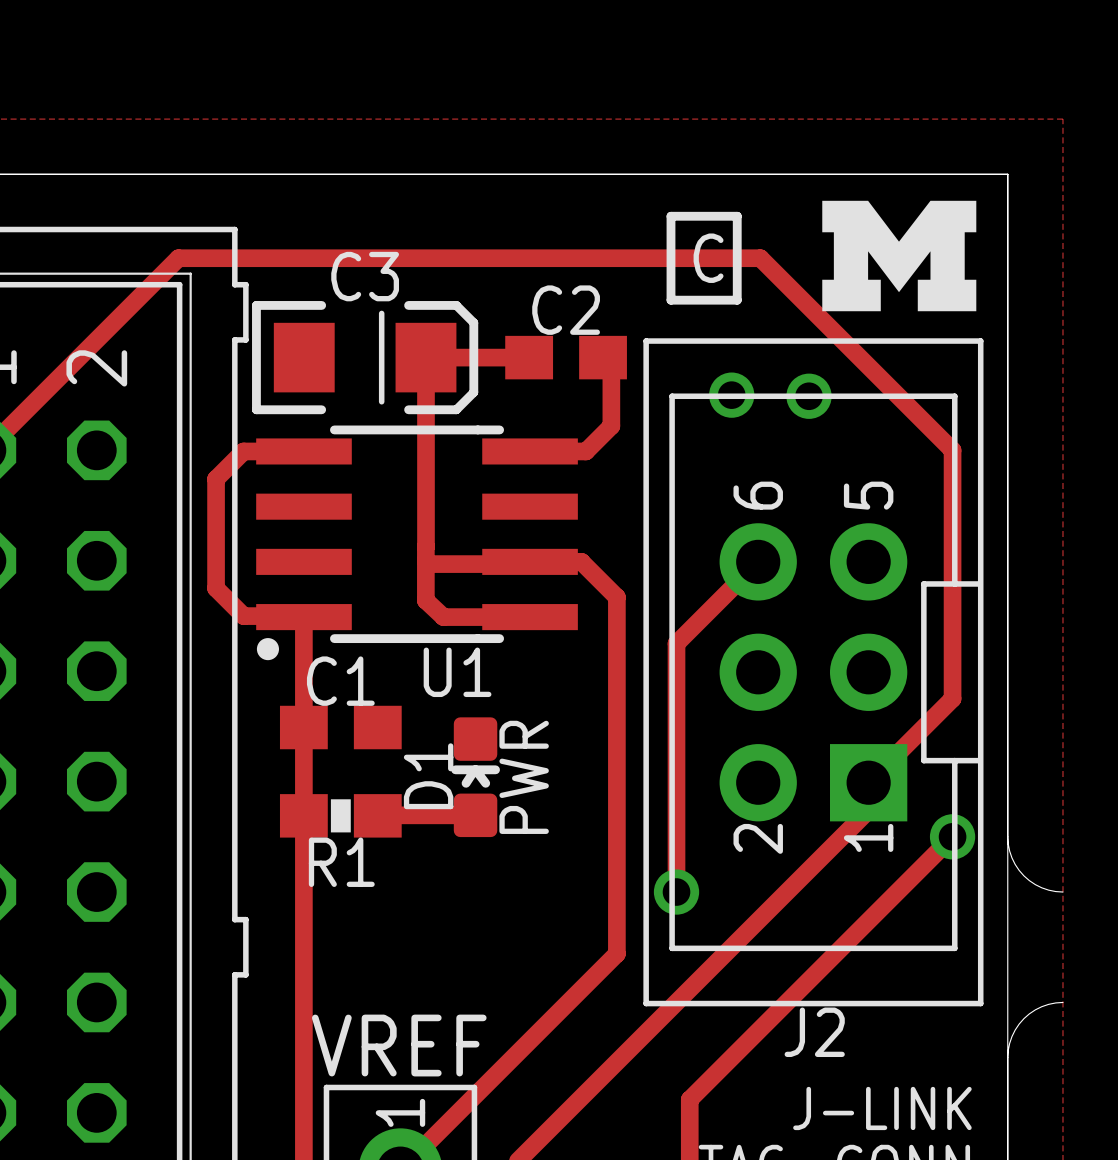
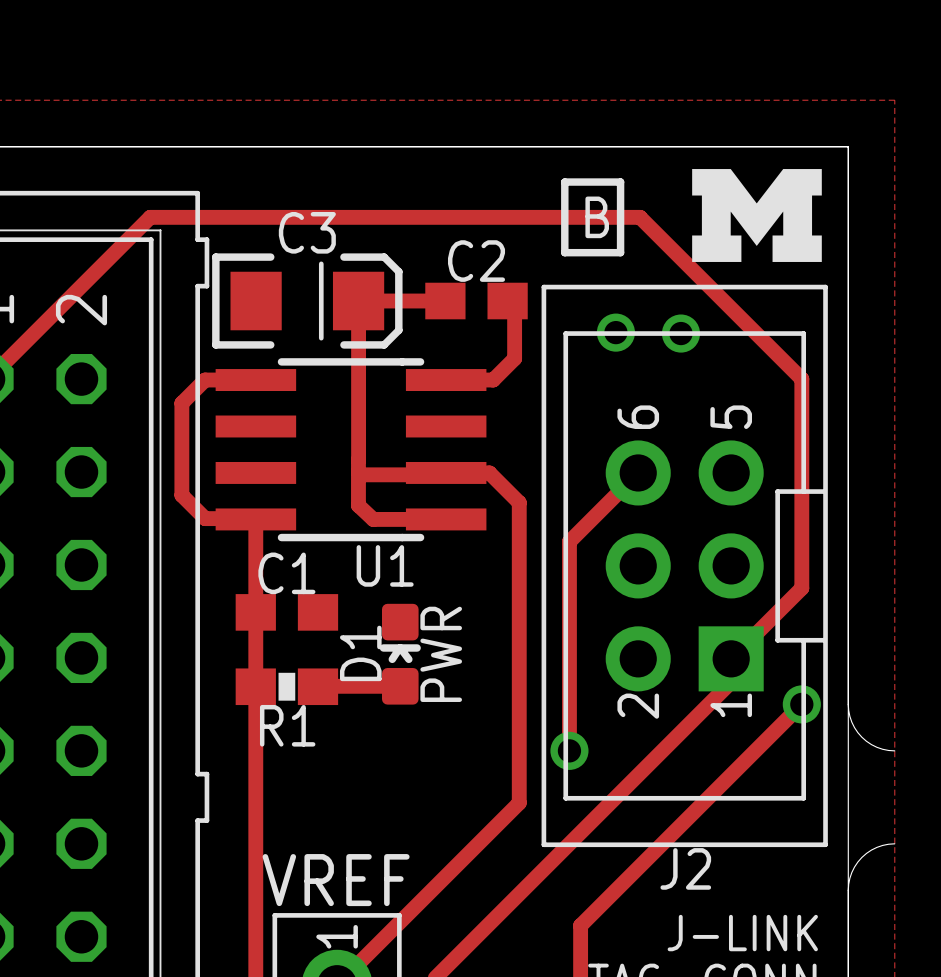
text: C (708, 258) -> B (597, 217)
drawing: [256, 638, 279, 661] -> none

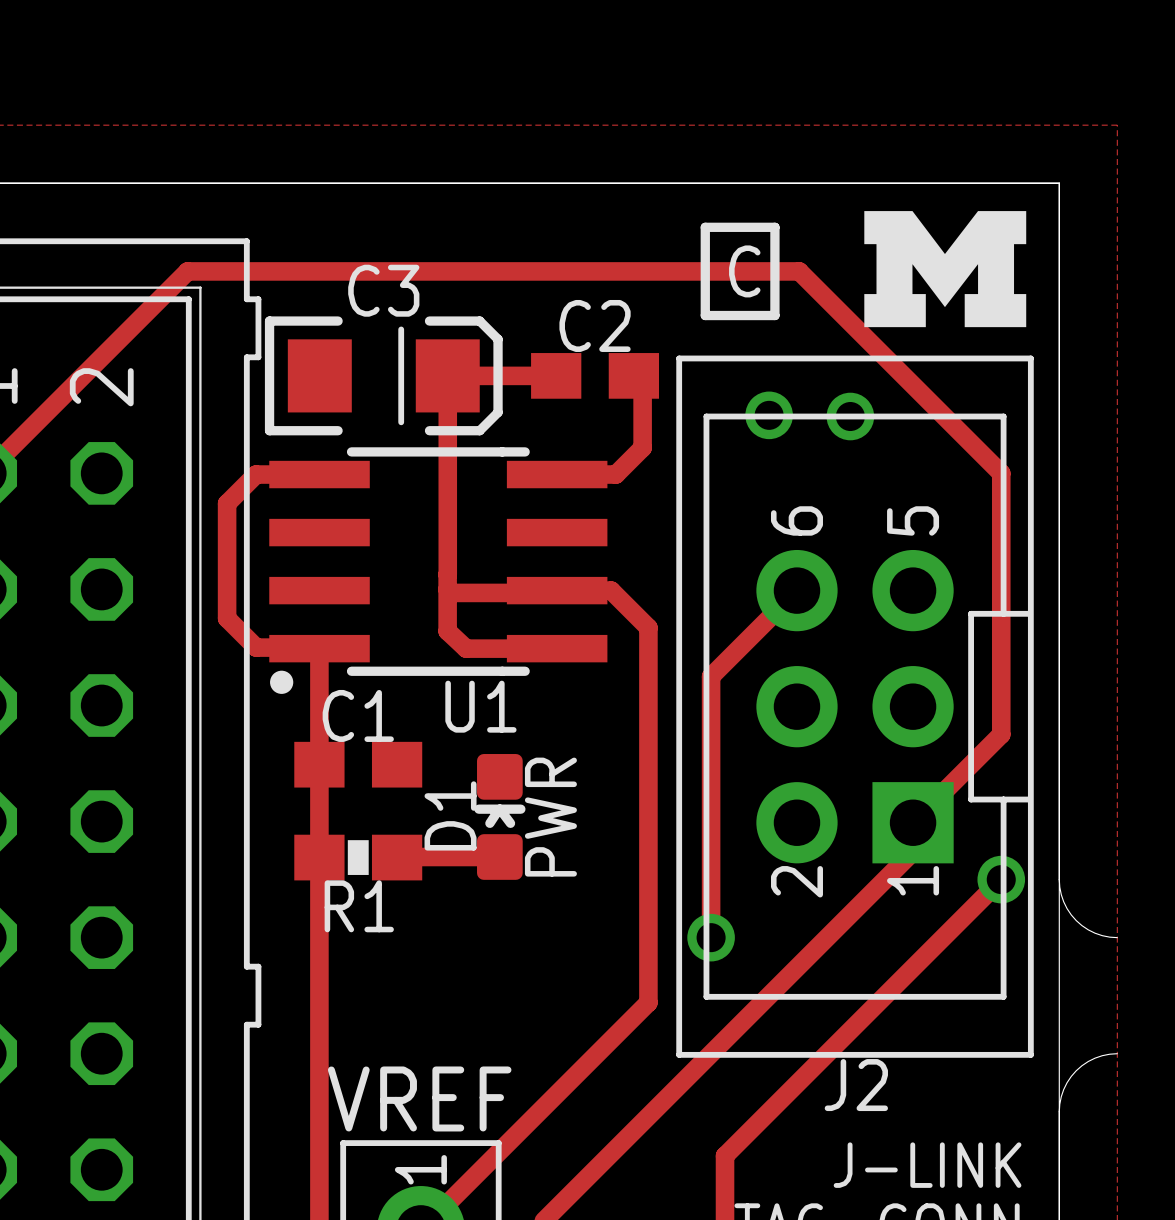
text: B (597, 217) -> C (744, 271)
drawing: none -> [270, 670, 294, 694]

